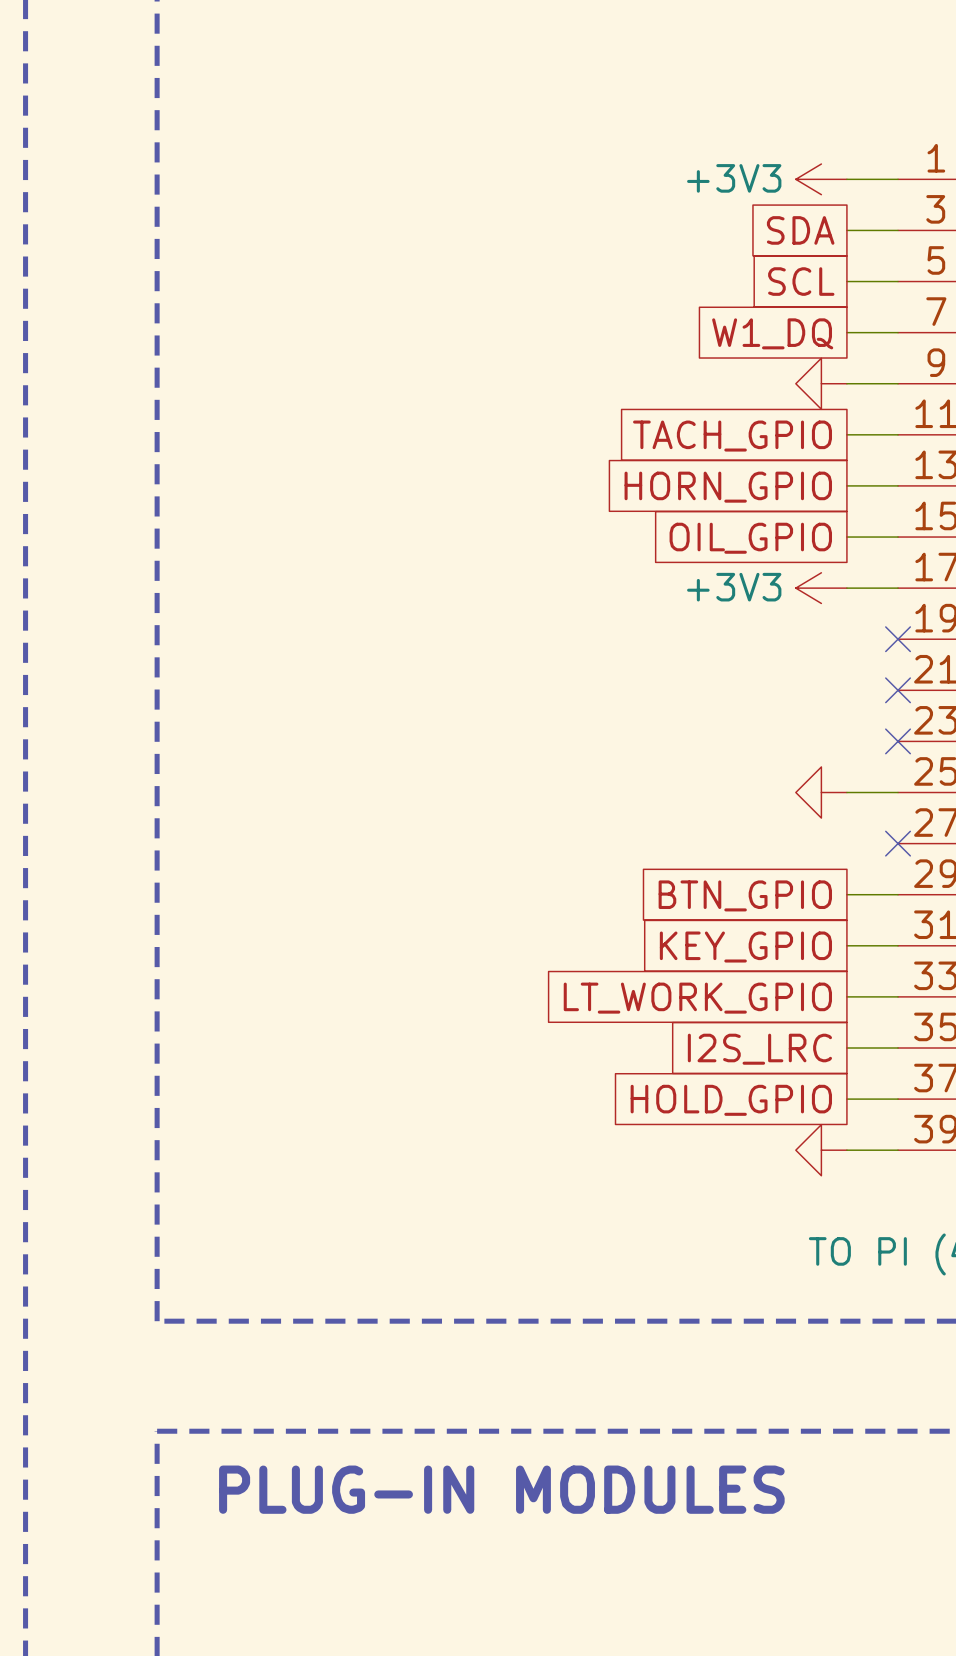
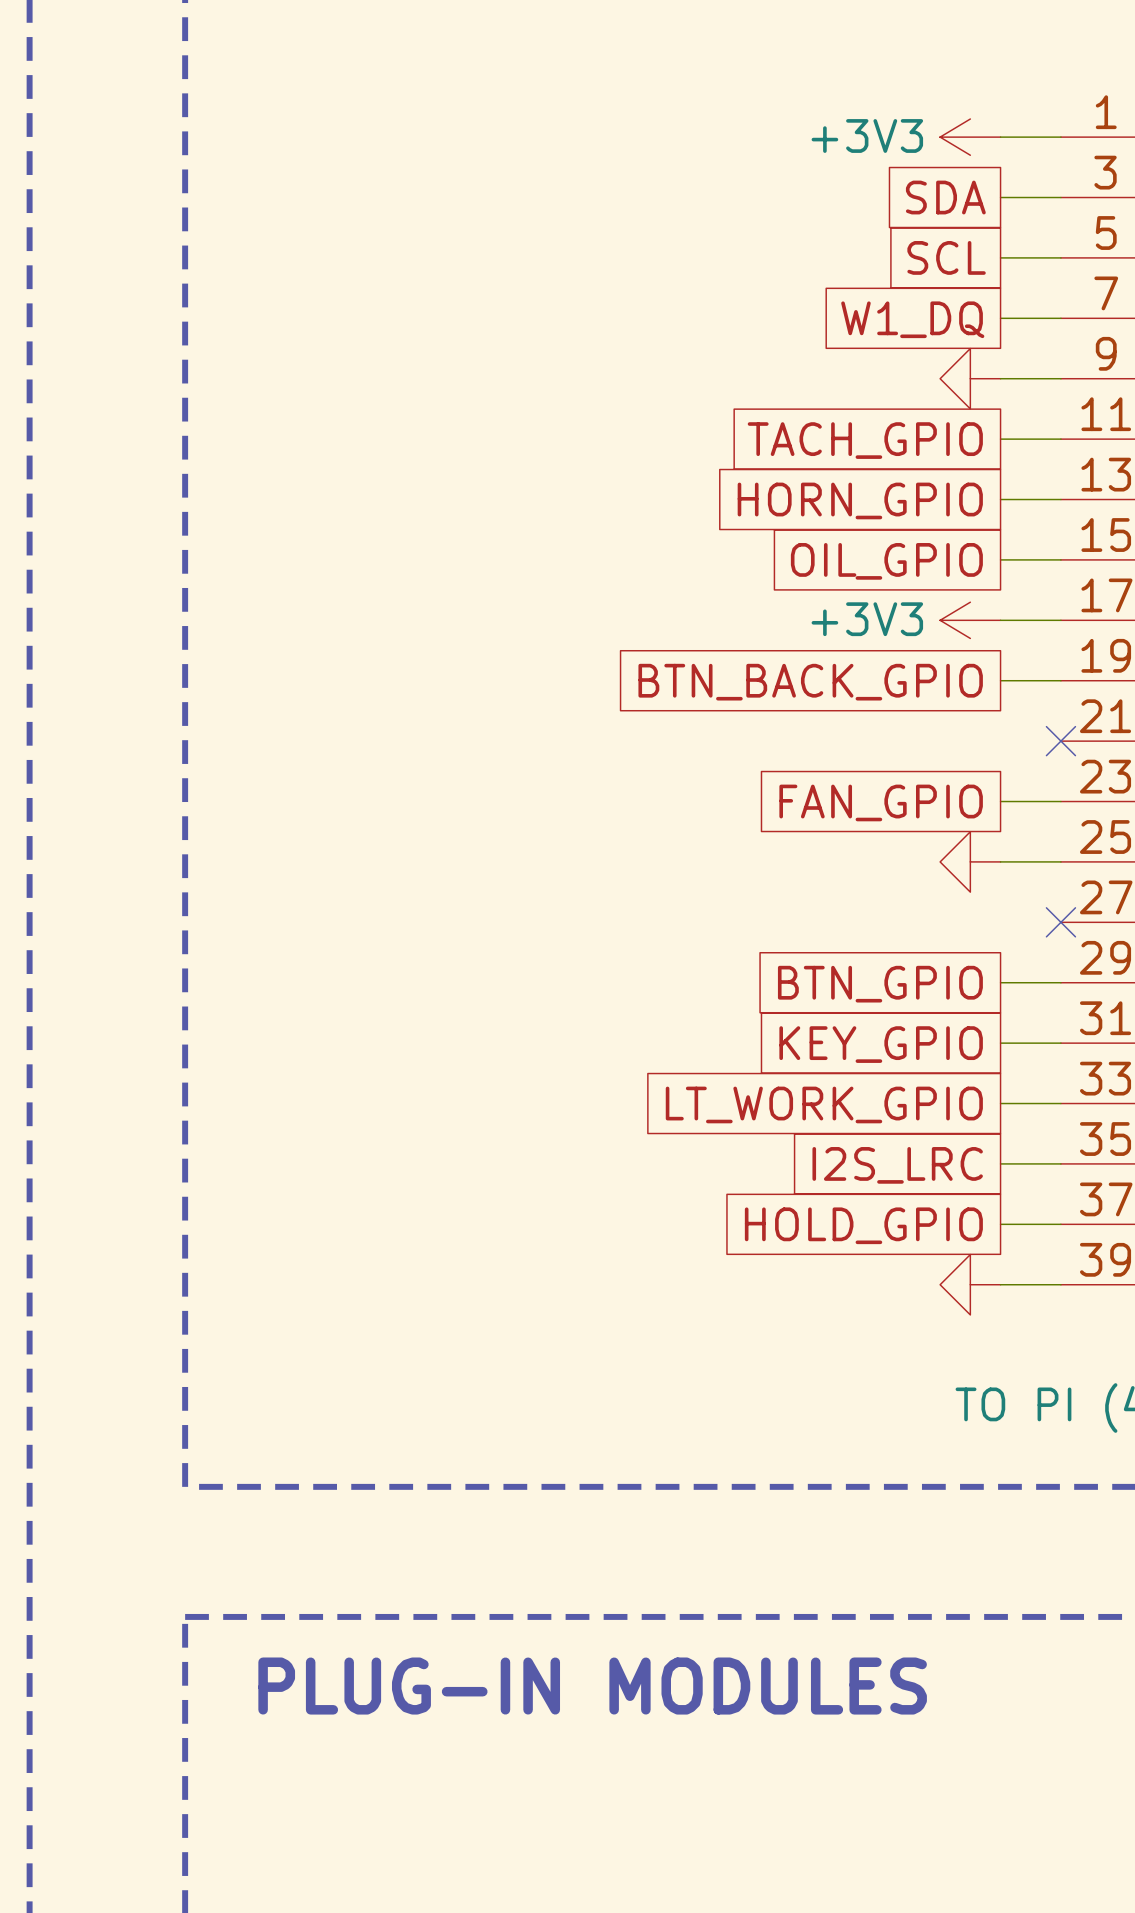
wire: none -> (1000, 680) (1060, 680)
no-connect mark: (898, 639) -> none
global label: none -> BTN_BACK_GPIO (810, 682)
wire: none -> (1000, 801) (1060, 801)
no-connect mark: (898, 741) -> none
global label: none -> FAN_GPIO (881, 802)

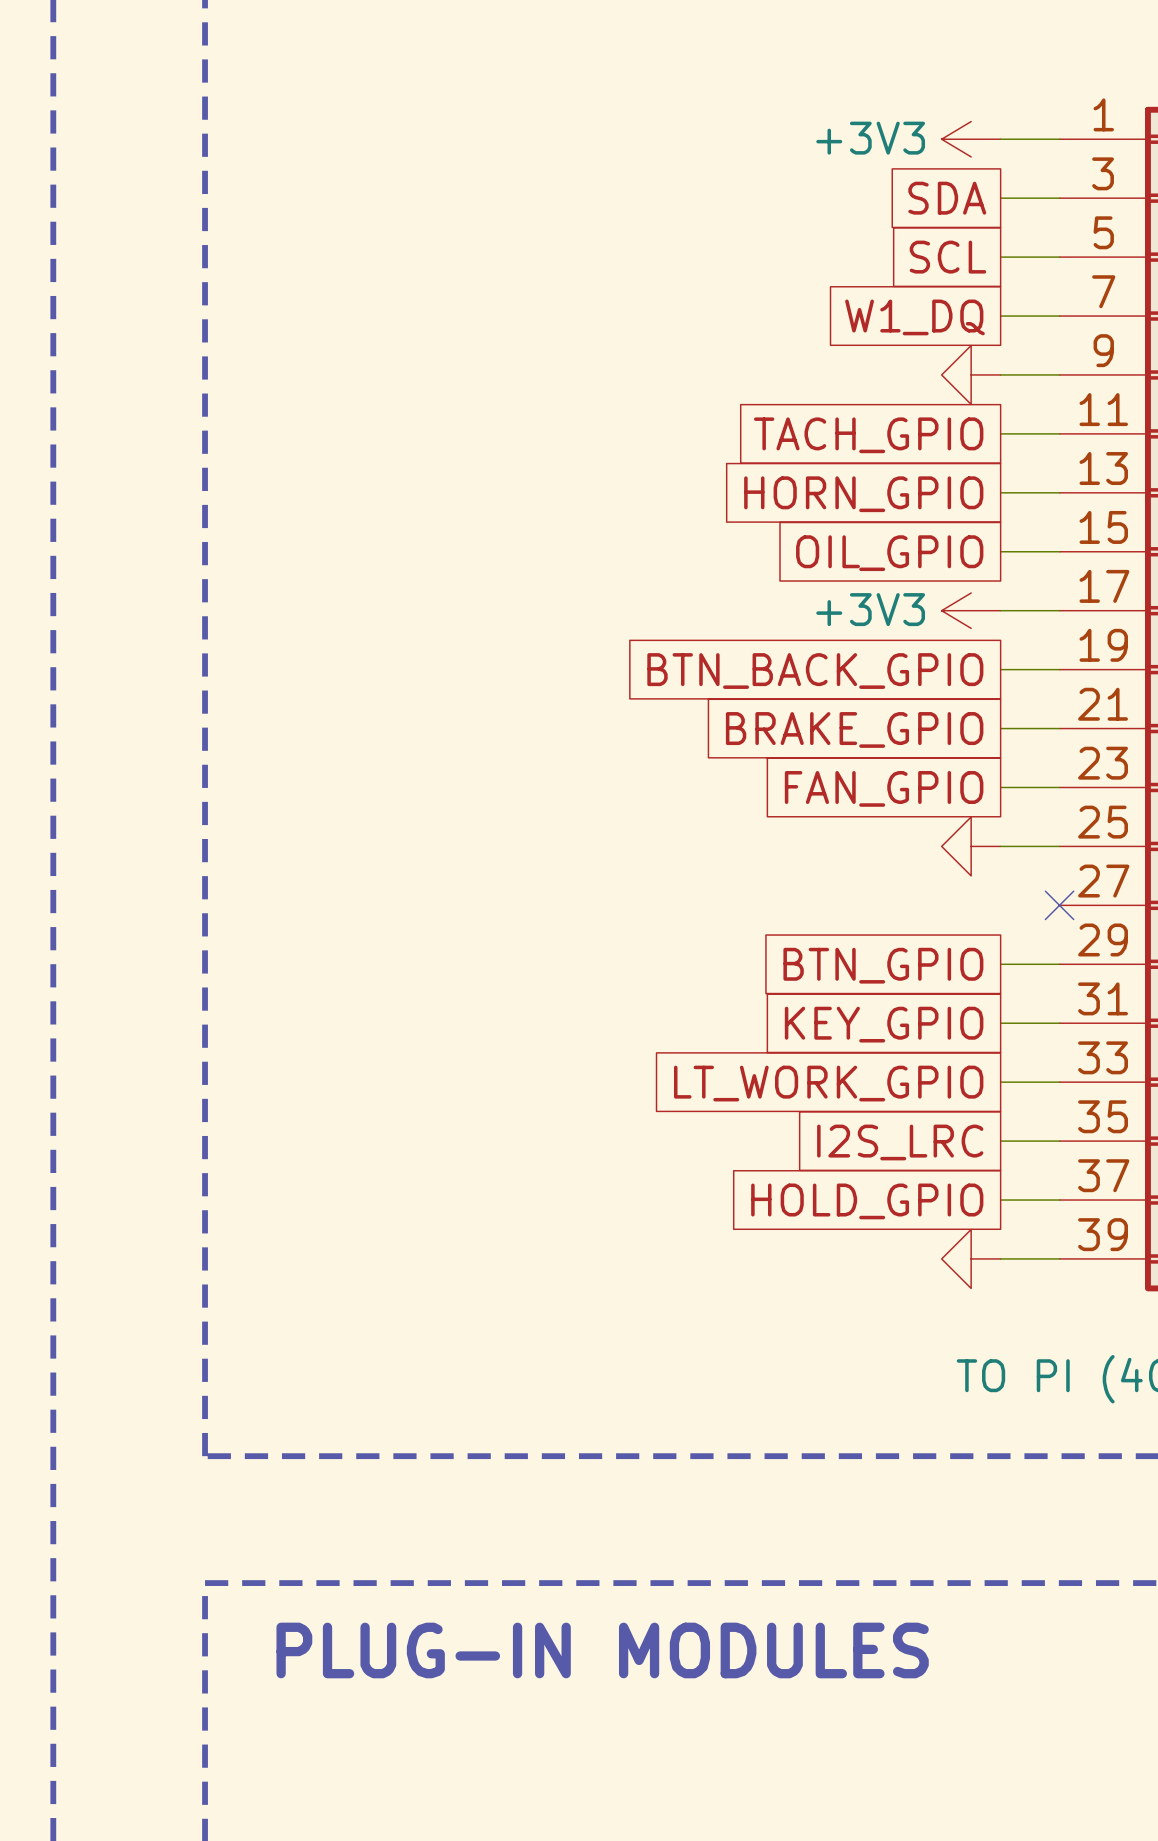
wire: none -> (1000, 728) (1059, 728)
no-connect mark: (1060, 741) -> none
global label: none -> BRAKE_GPIO (854, 729)

